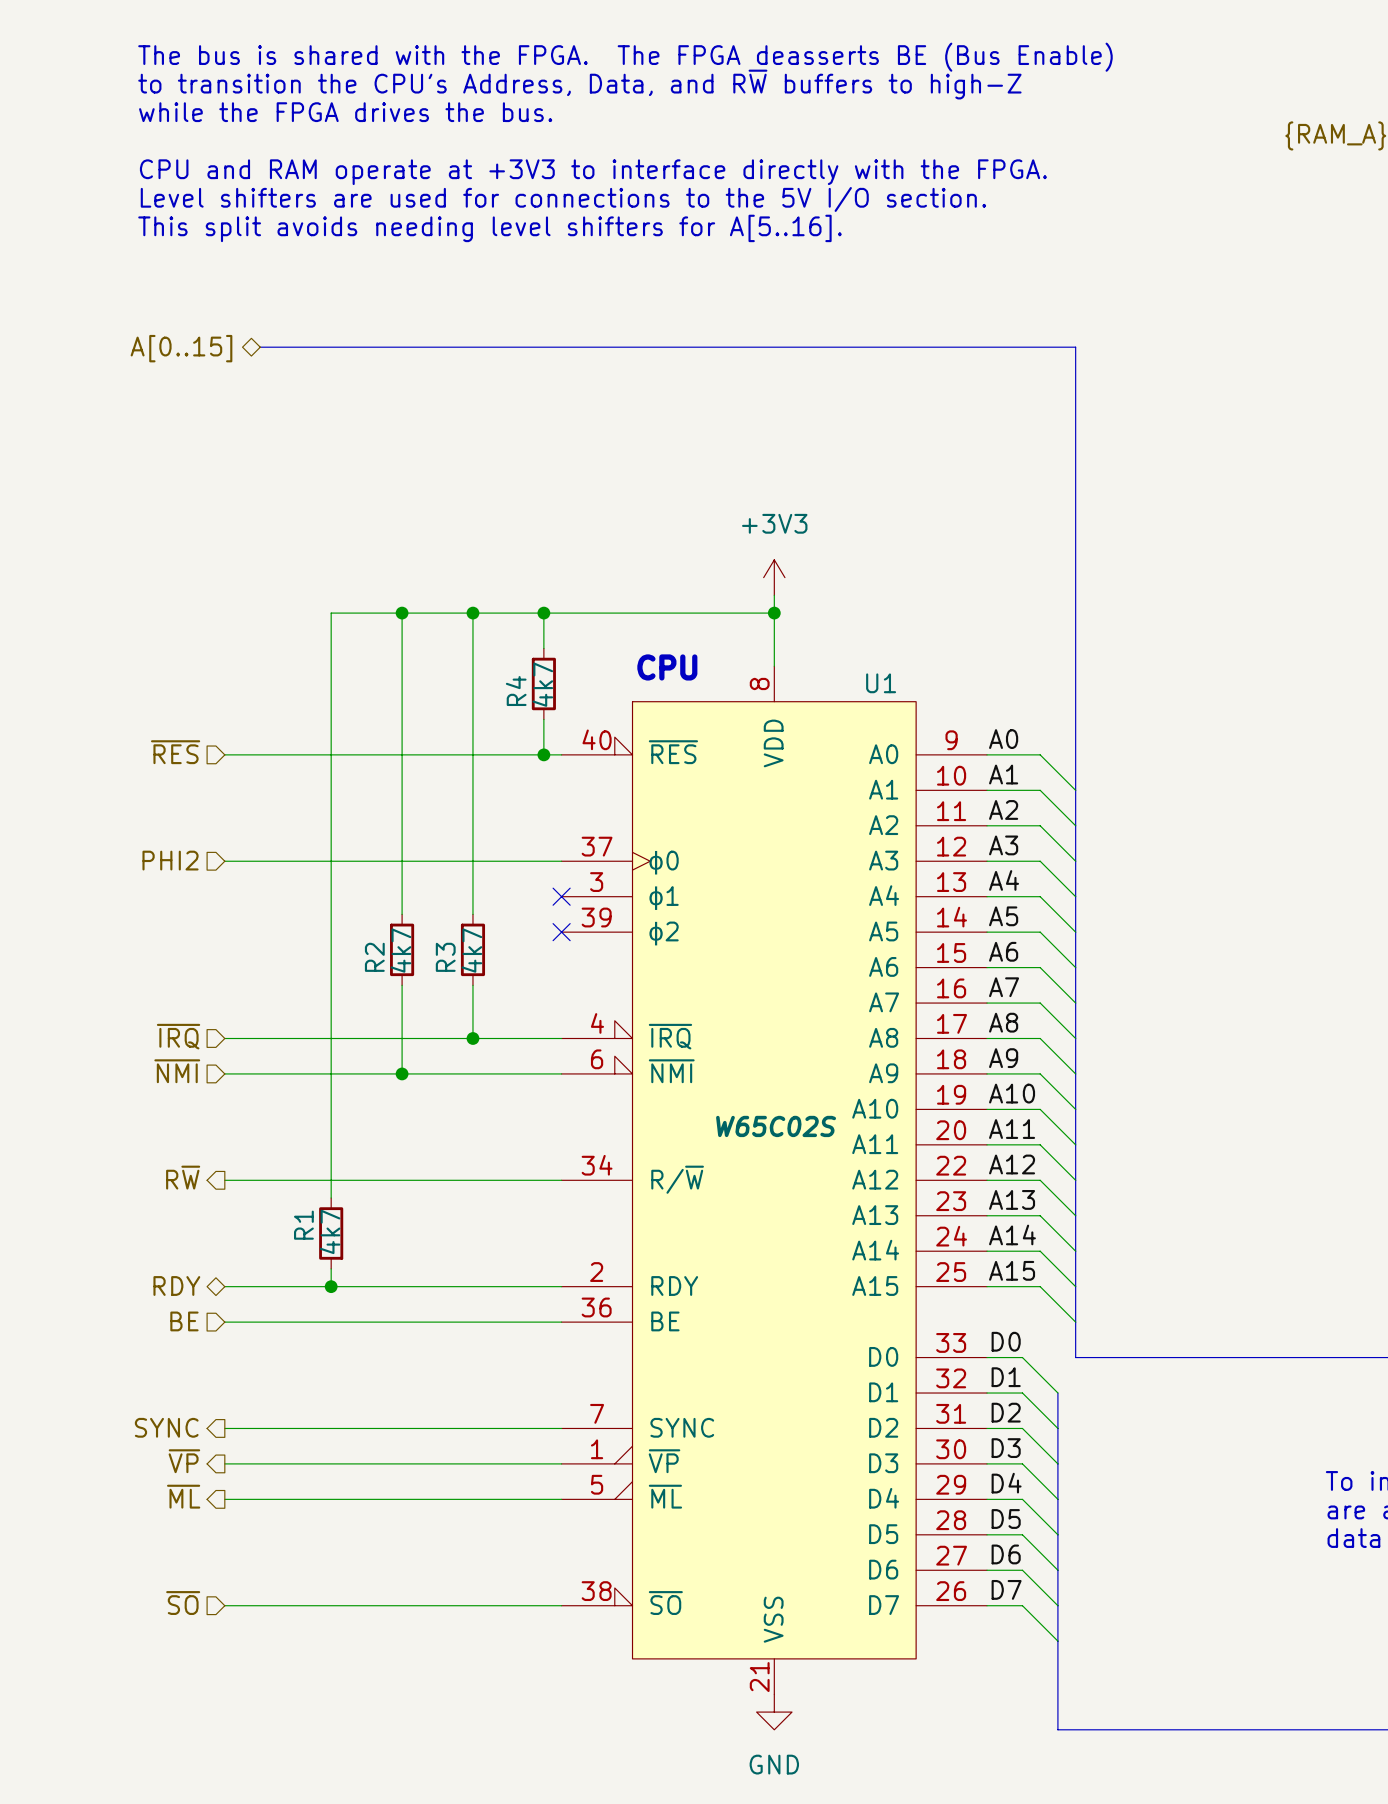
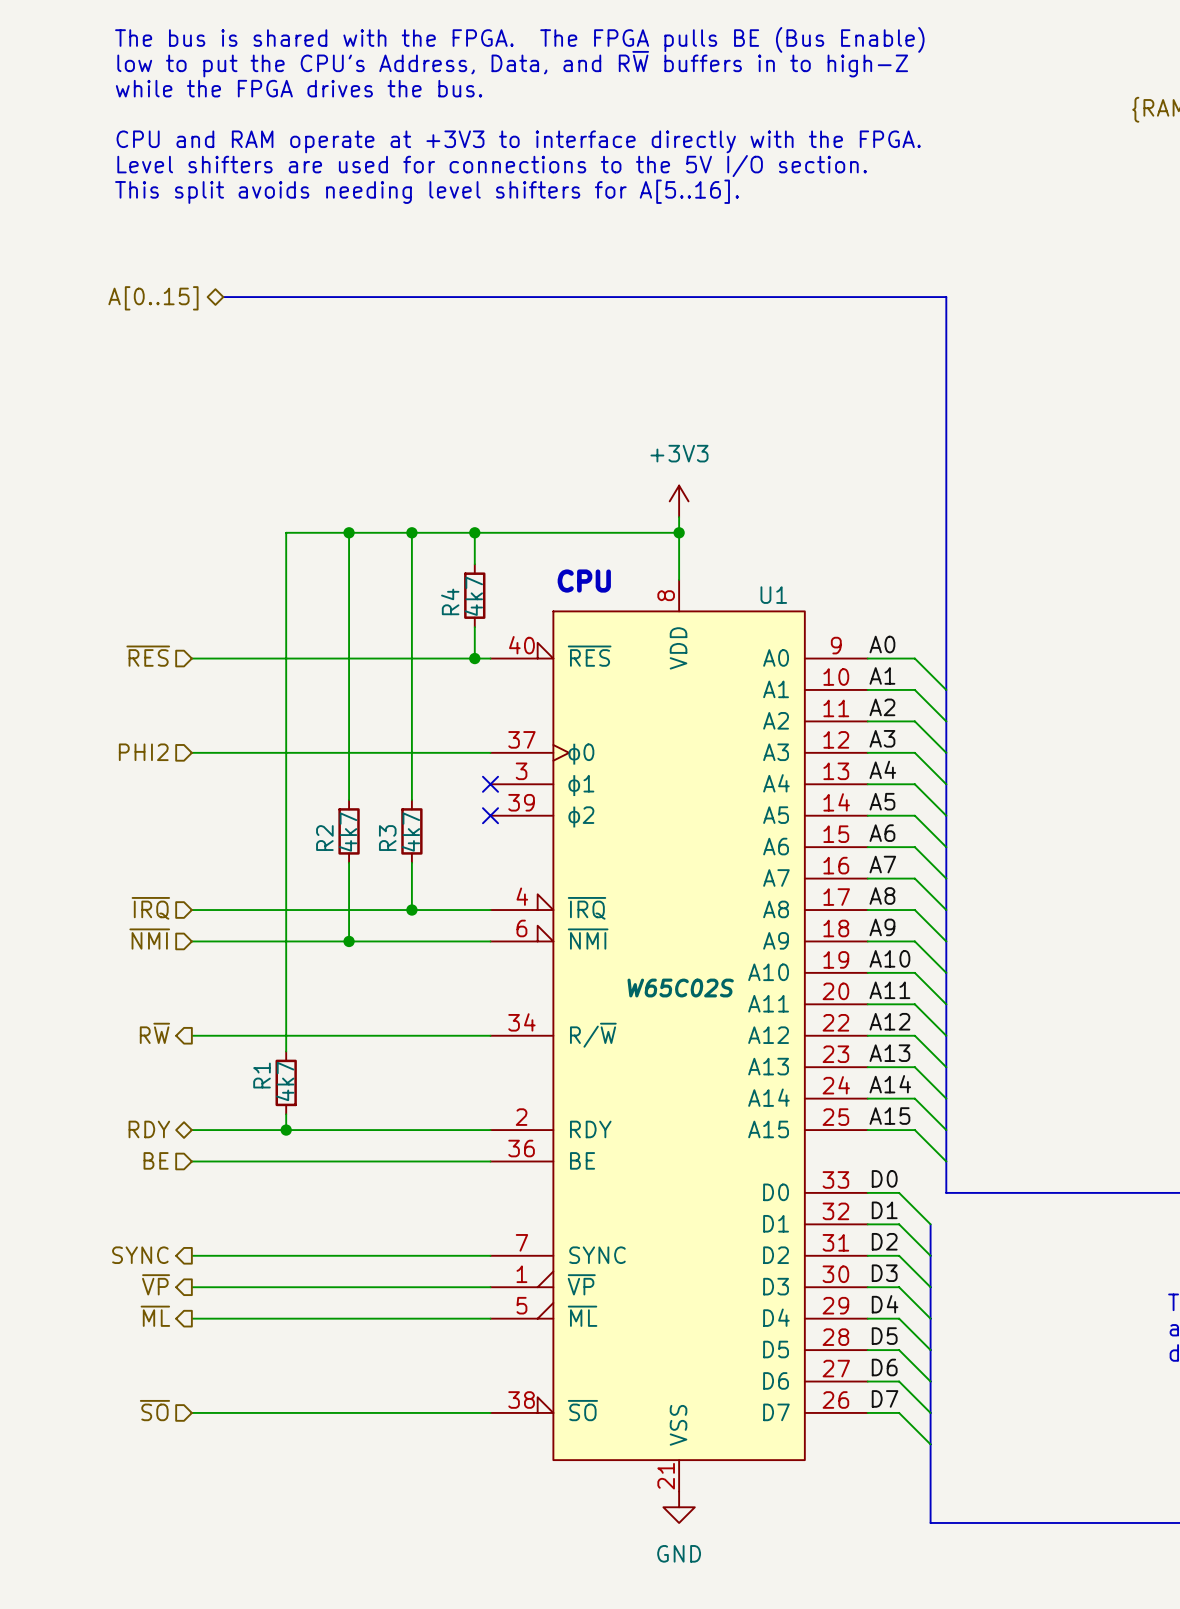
text: The bus is shared with the FPGA. The FPGA deasserts BE (Bus Enable) (625, 57) -> The bus is shared with the FPGA. The FPGA pulls BE (Bus Enable) (519, 39)
text: to transition the CPU's Address, Data, and R~{W} buffers to high-Z (579, 84) -> low to put the CPU's Address, Data, and R~{W} buffers in to high-Z (512, 64)

